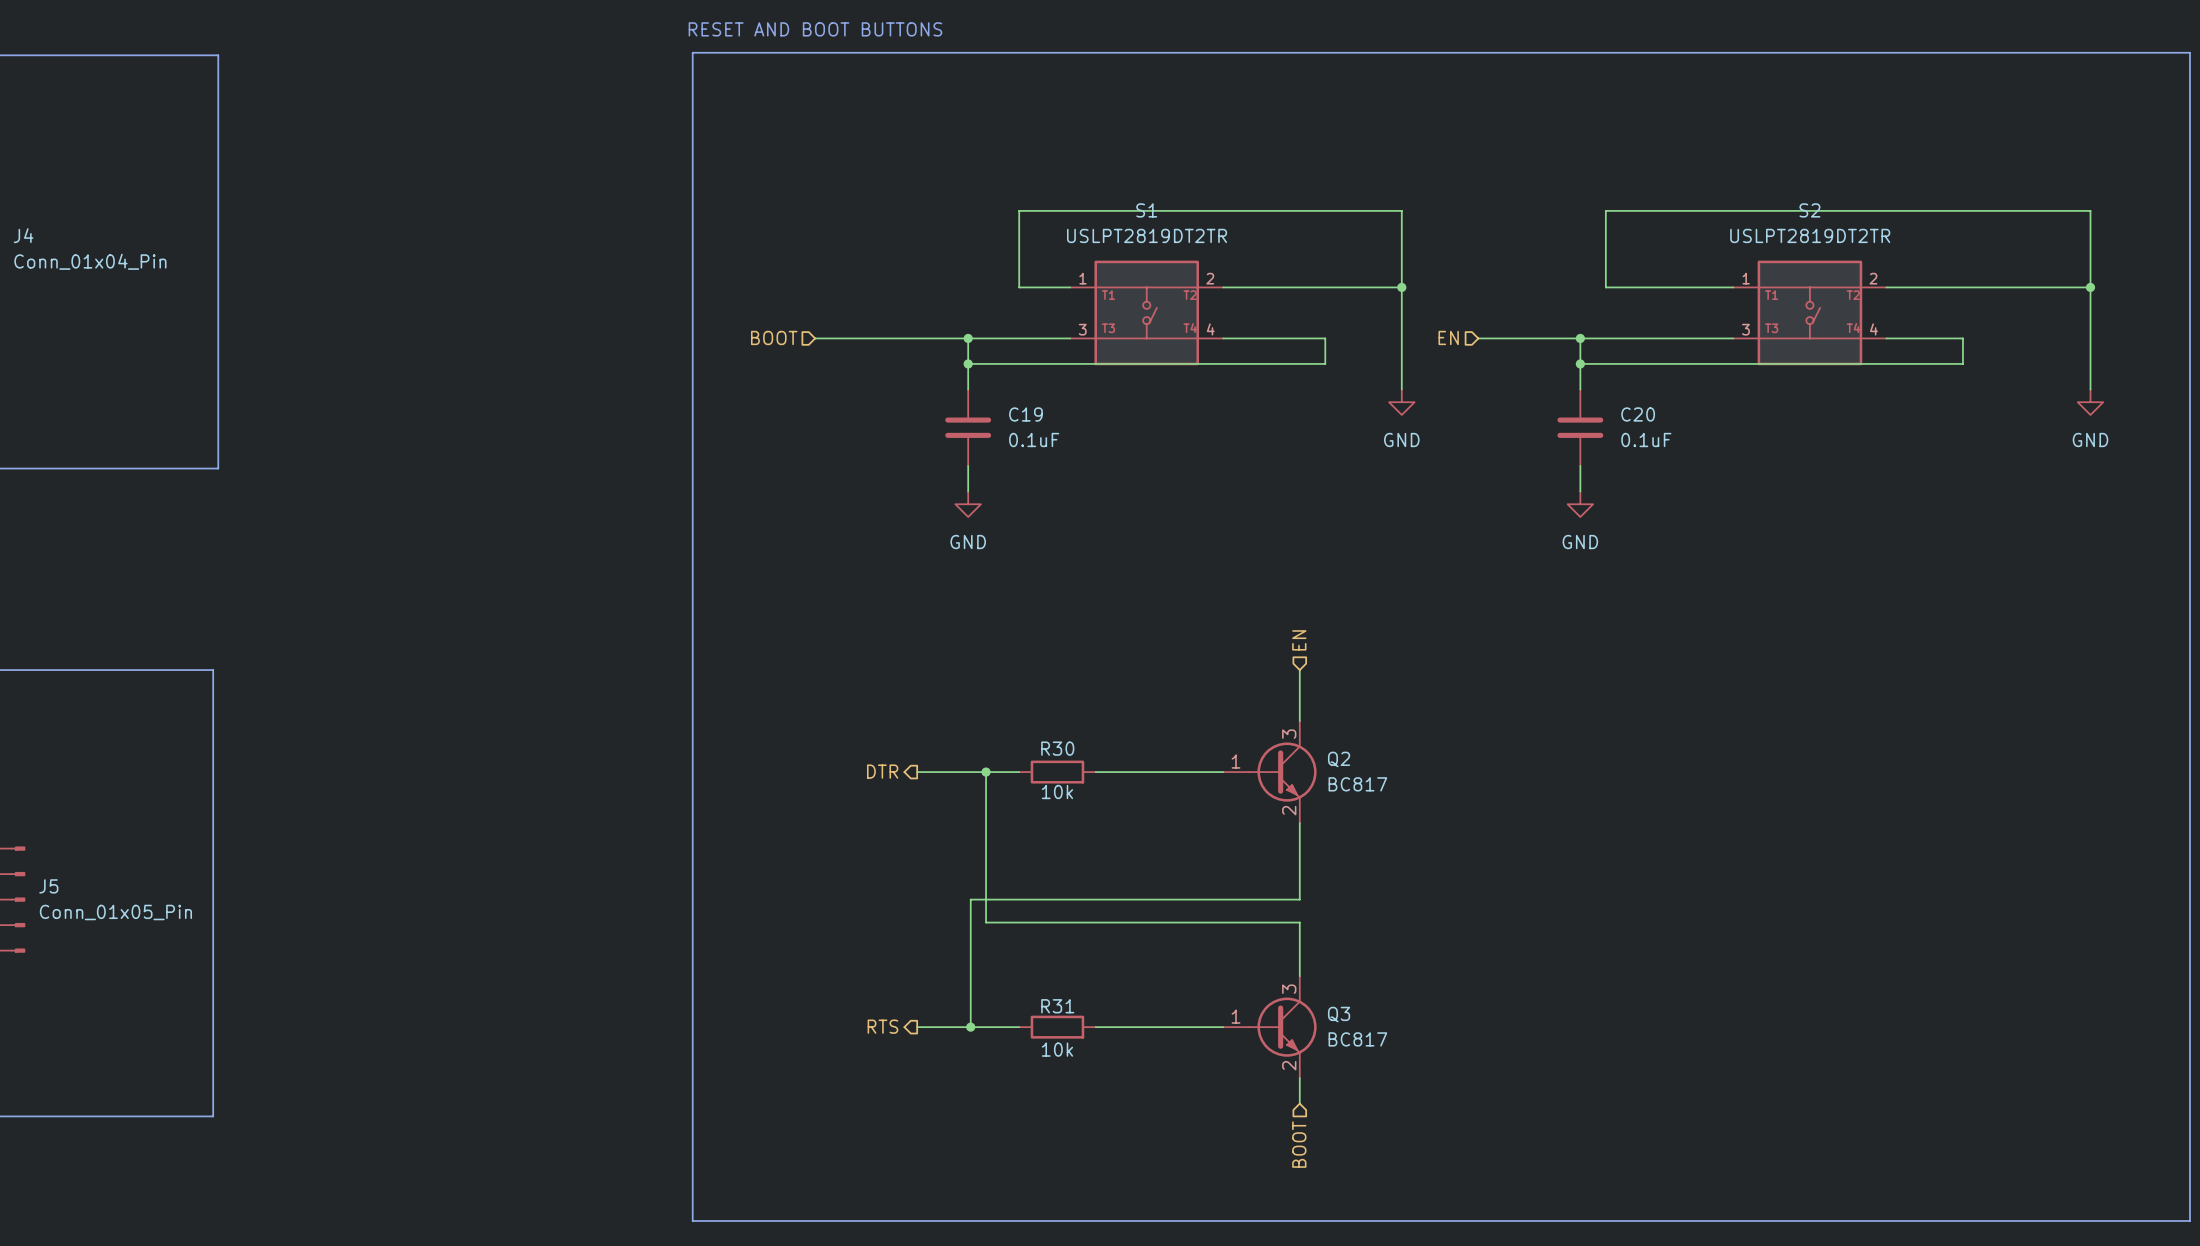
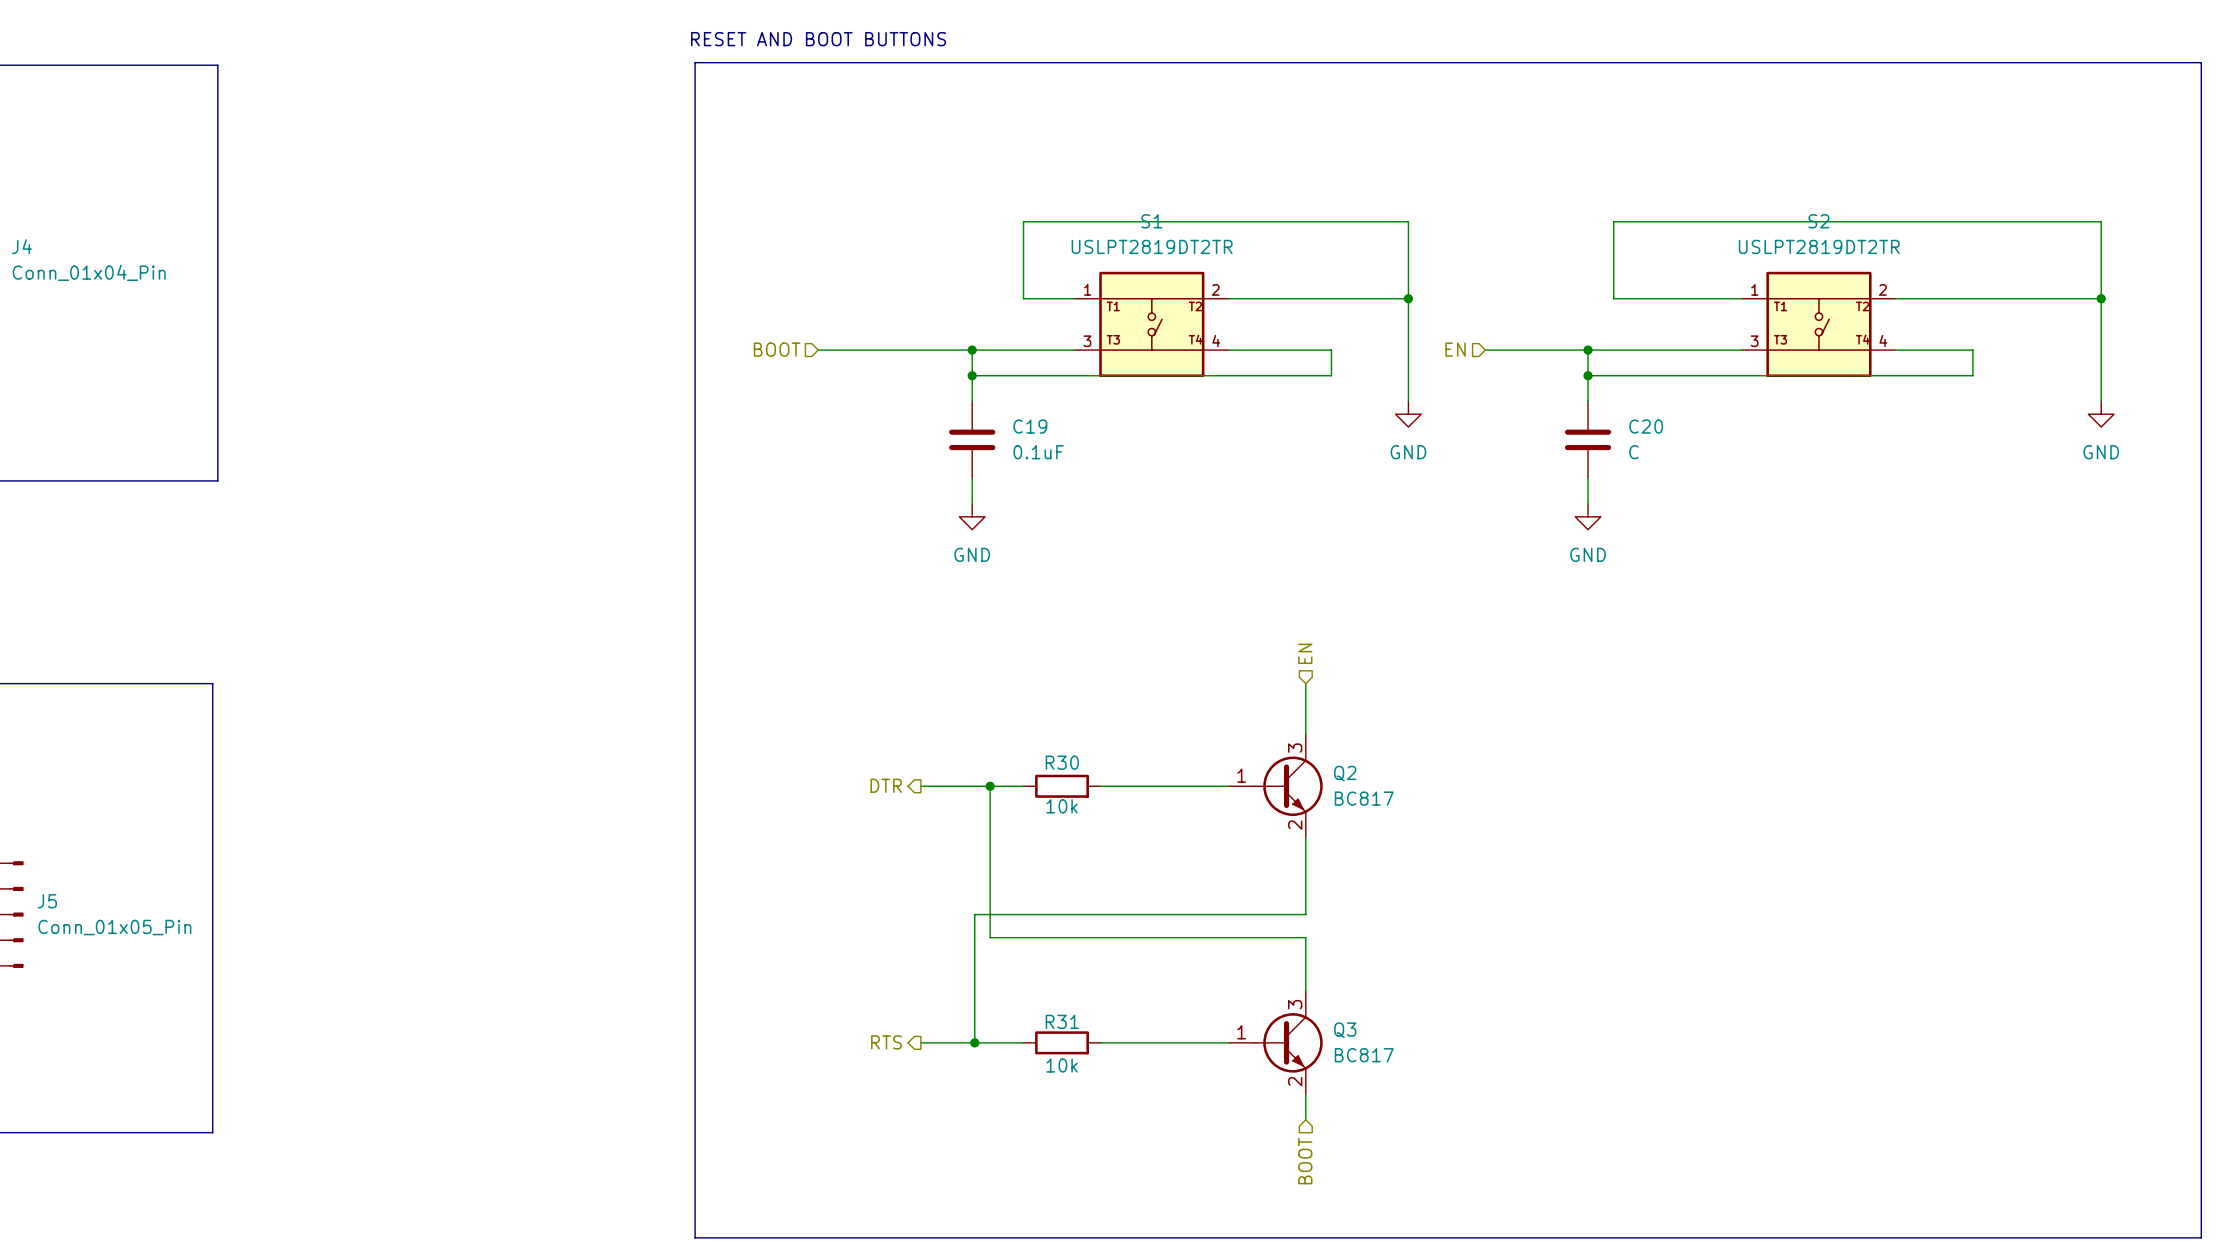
C20 value: 0.1uF (1646, 440) -> C (1633, 452)

